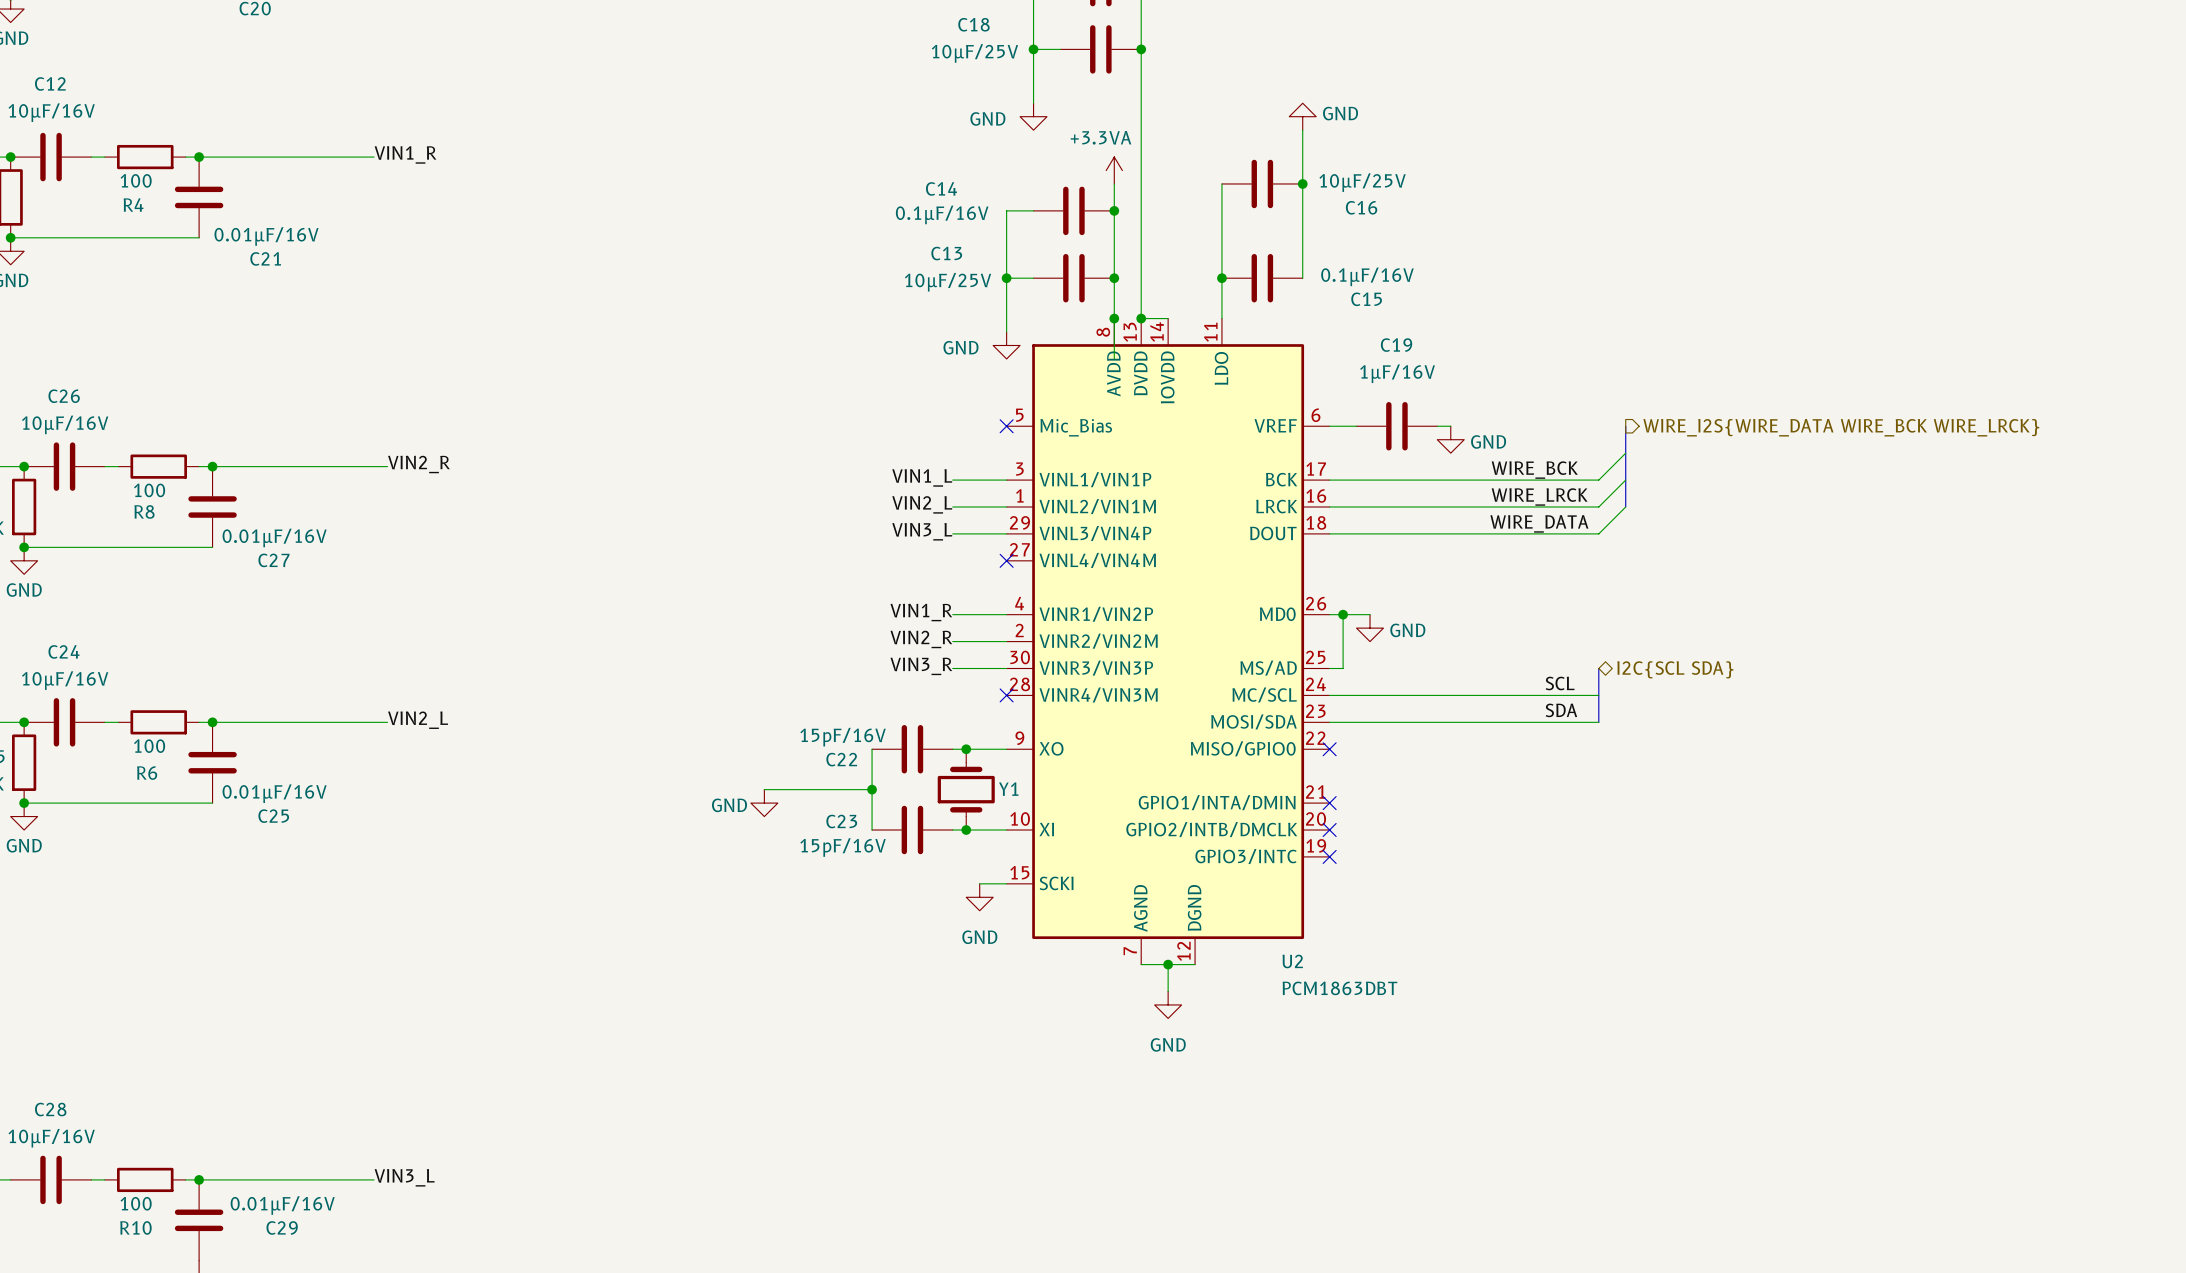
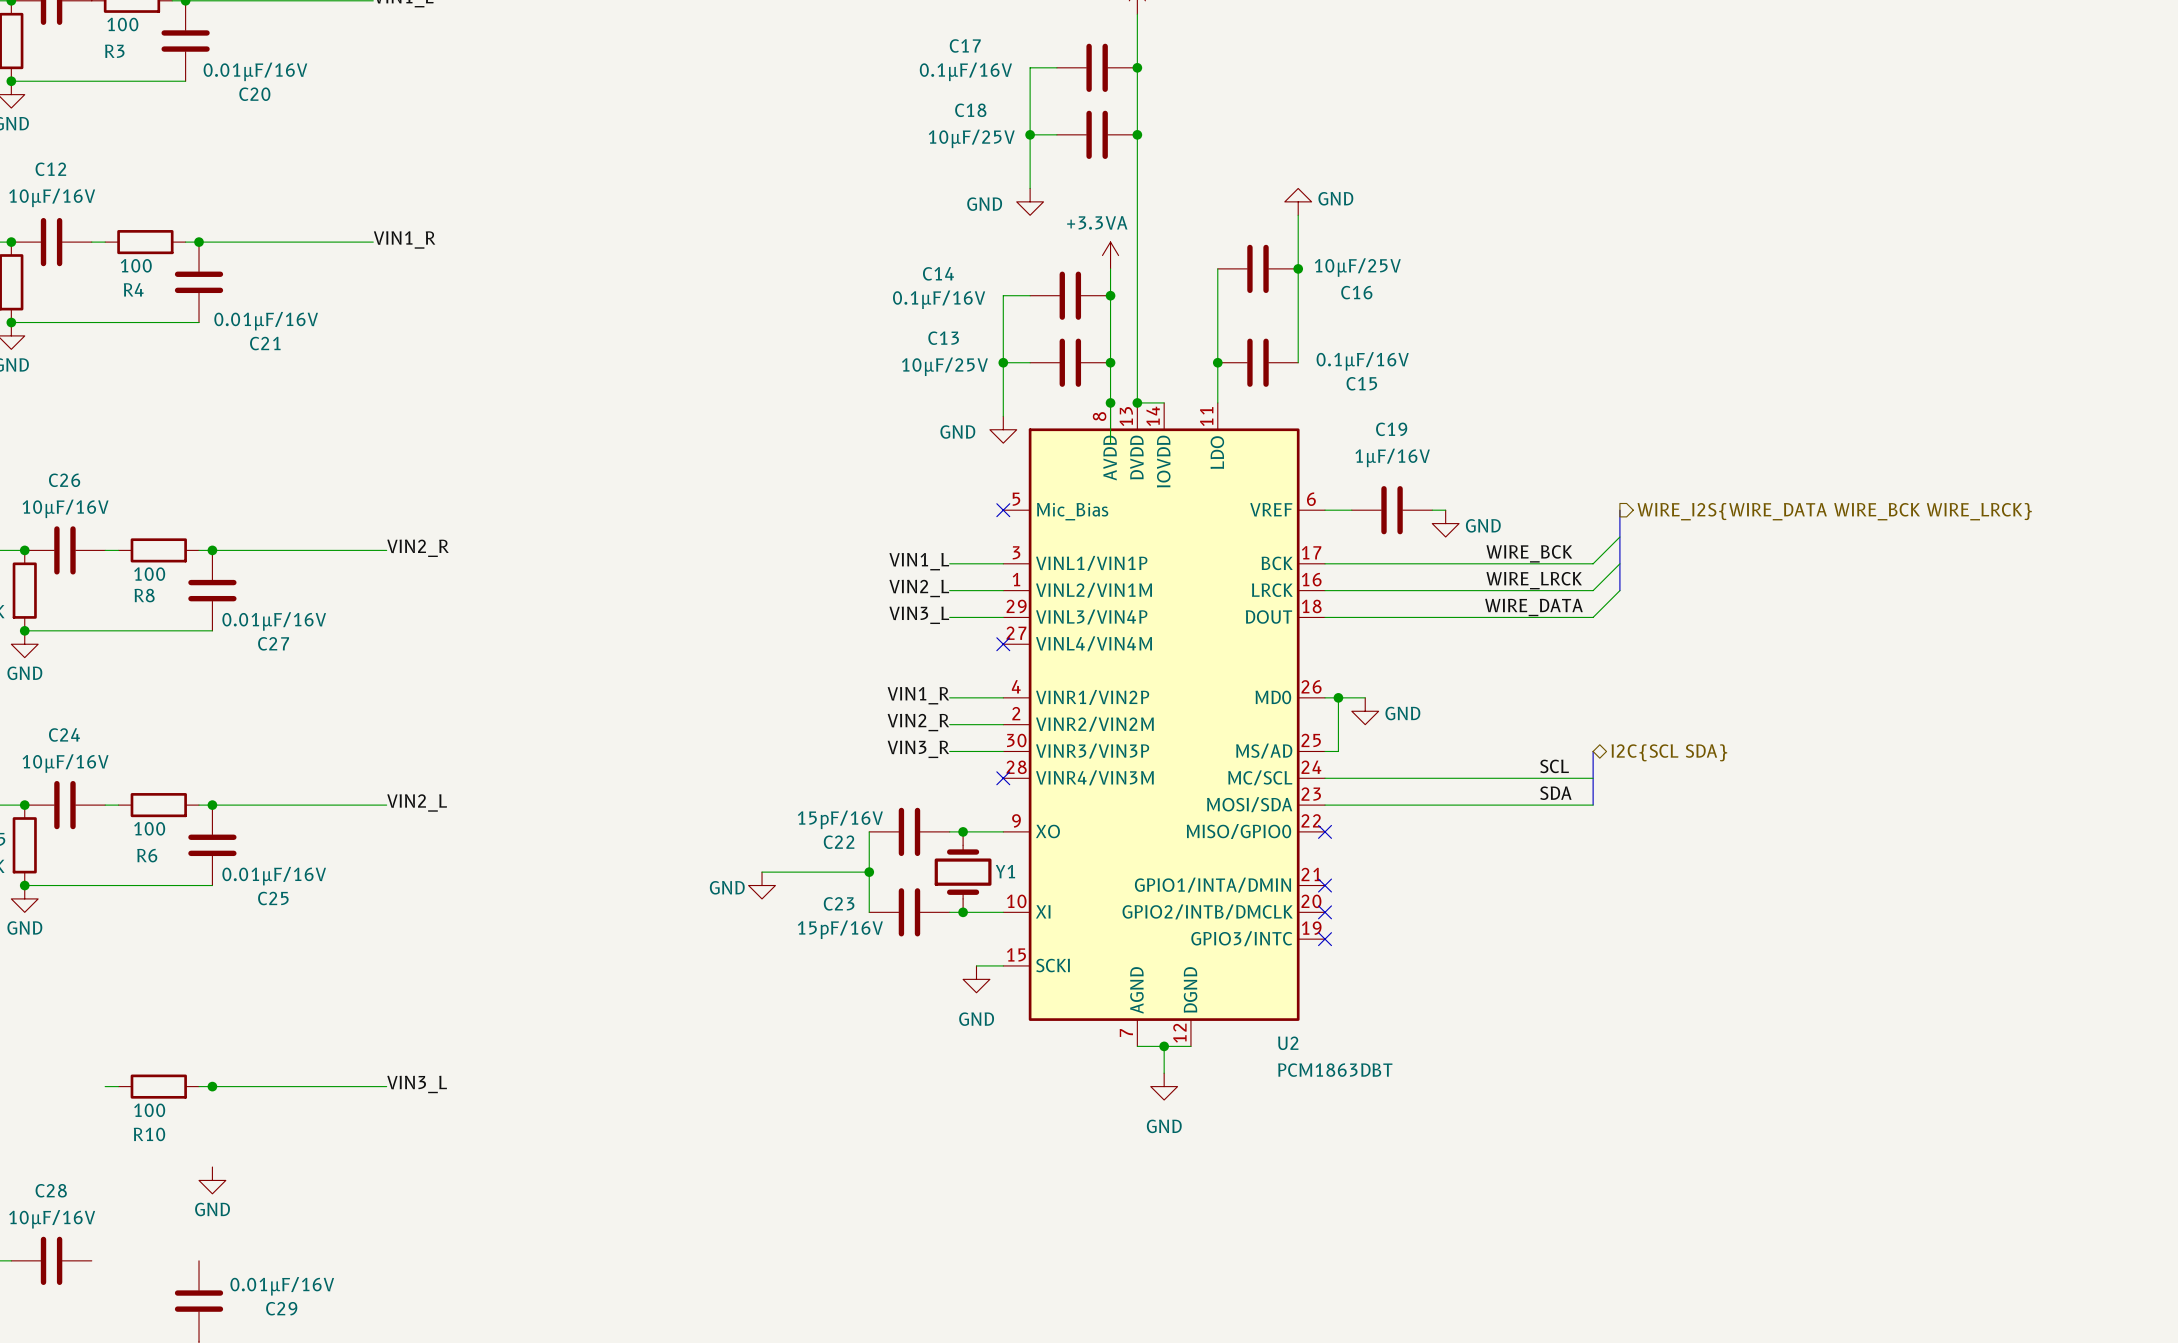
junction: none -> (212, 1086)
power symbol: none -> GND (212, 1180)
label position: VIN3_L (404, 1177) -> VIN3_L (417, 1084)
wire: (91, 1179) (104, 1179) -> (105, 1086) (118, 1086)
R10 position: (145, 1179) -> (158, 1086)
wire: (185, 1179) (374, 1179) -> (199, 1086) (386, 1086)
junction: (199, 1179) -> none

